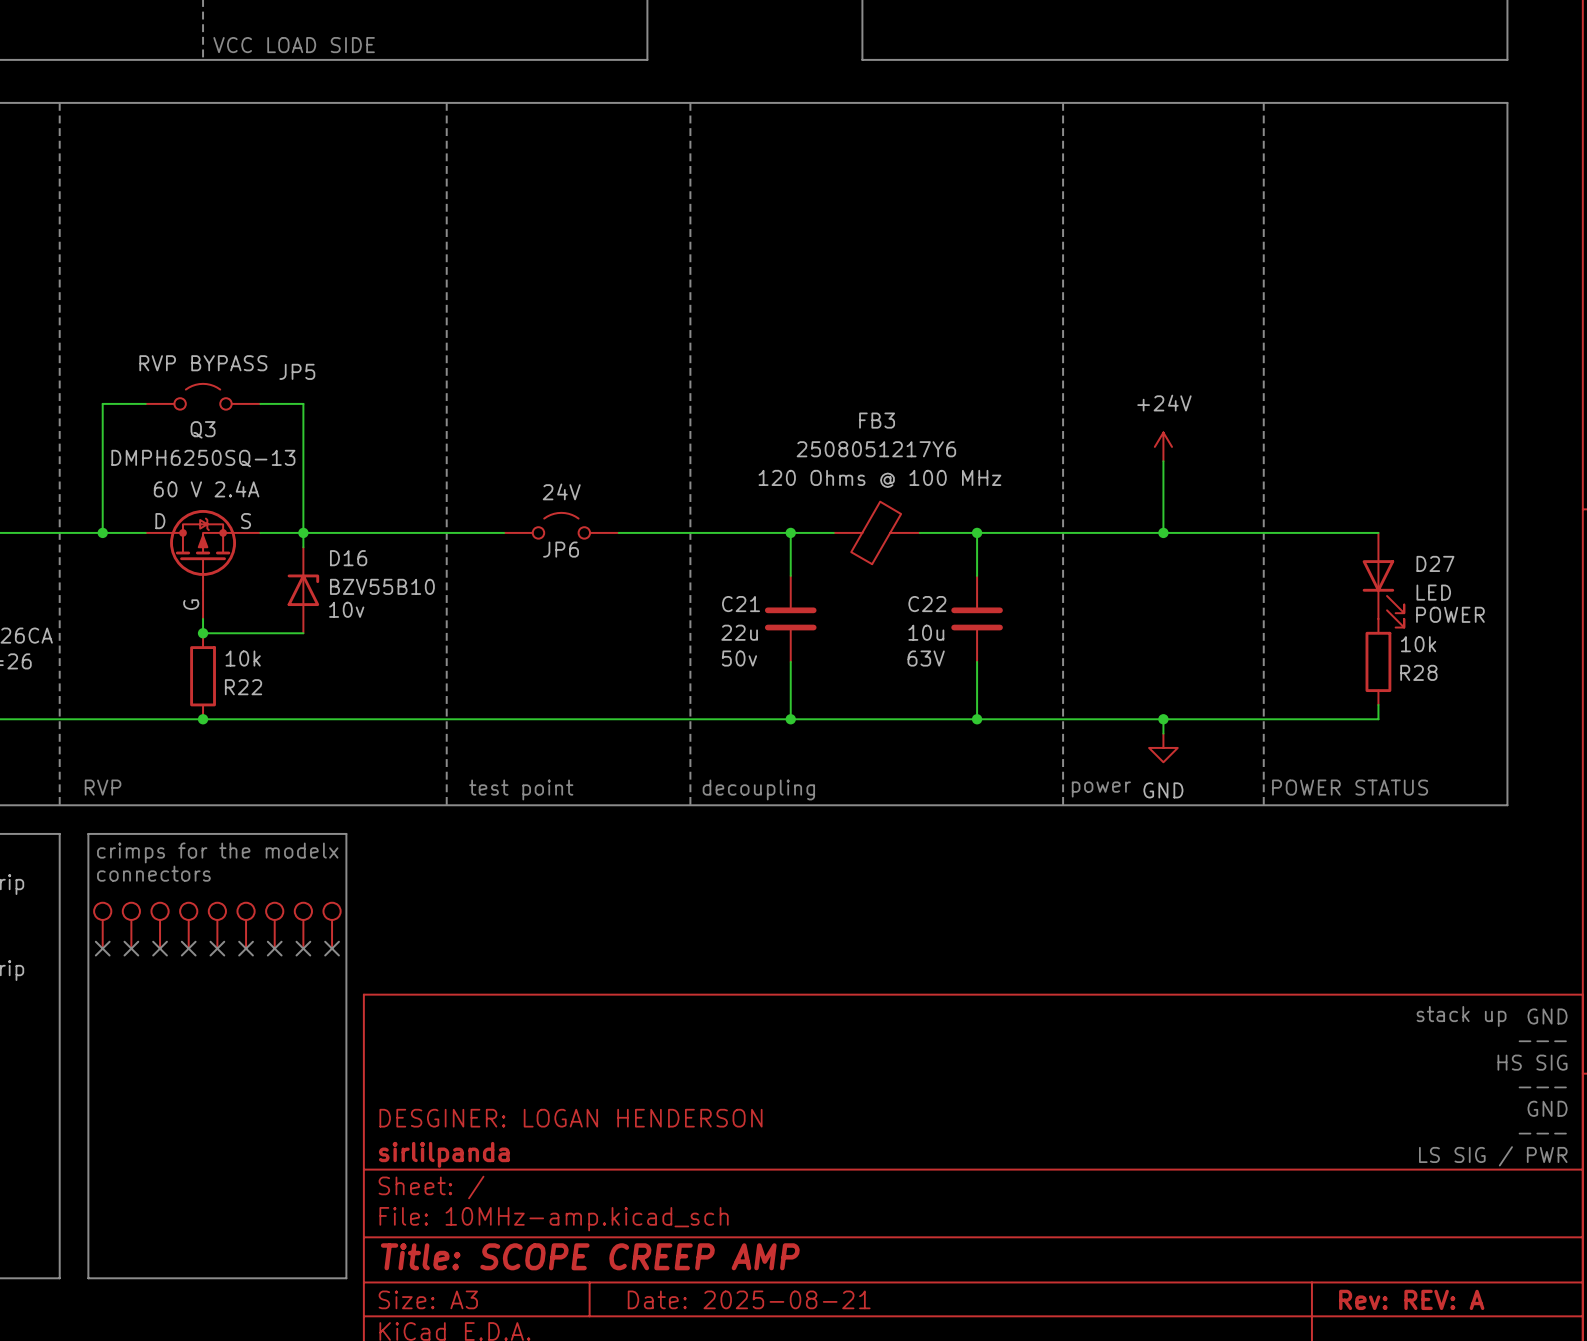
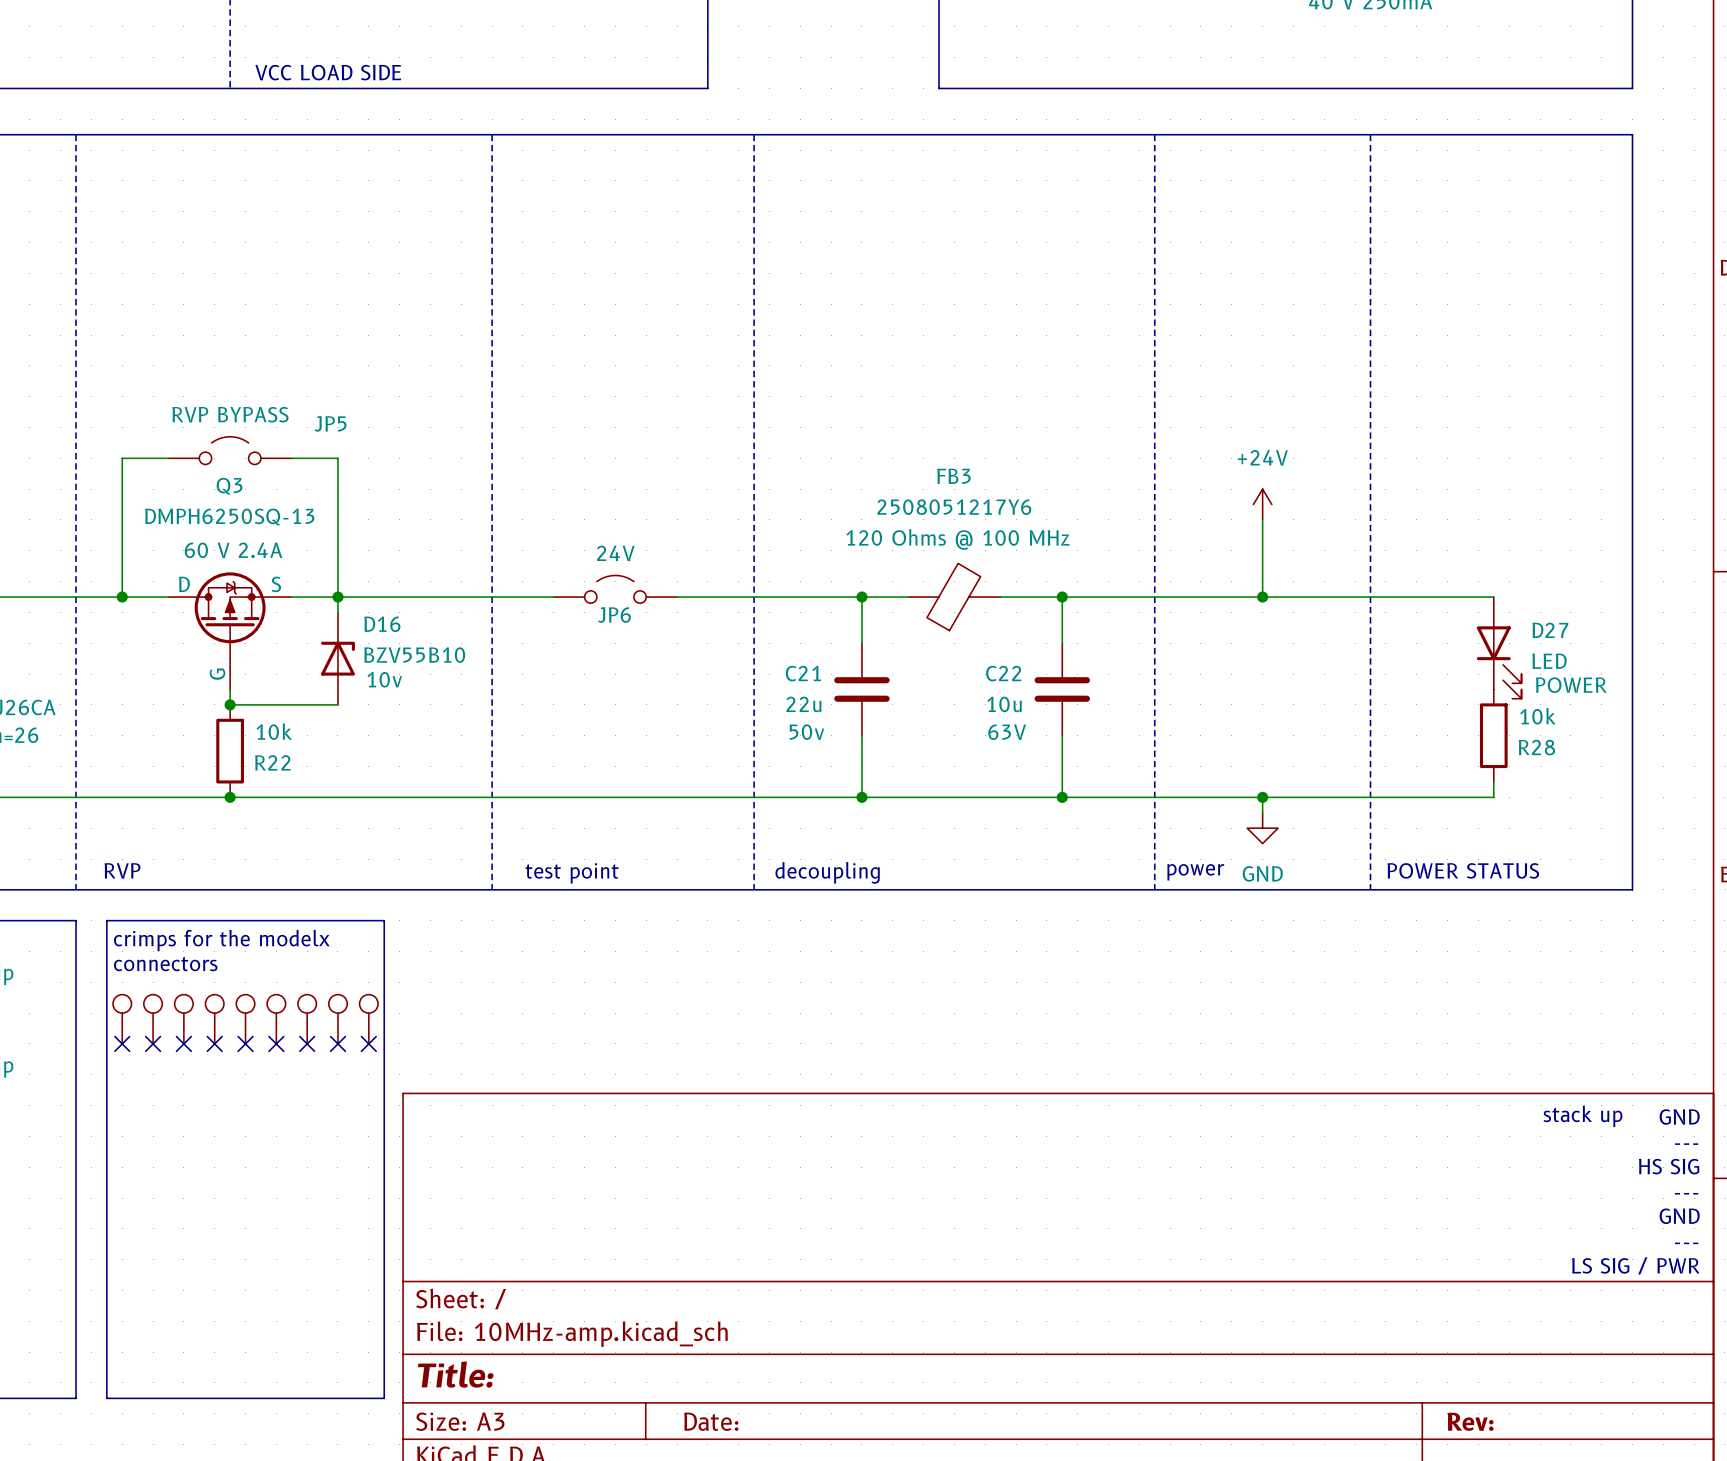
title block: DESGINER: LOGAN HENDERSON (570, 1118) -> none
title block: sirlilpanda (444, 1154) -> none
title block: Title: SCOPE CREEP AMP (590, 1256) -> Title: (455, 1374)
title block: Date: 2025-08-21 (749, 1299) -> Date: (711, 1421)
title block: Rev: REV: A (1411, 1299) -> Rev: (1470, 1421)

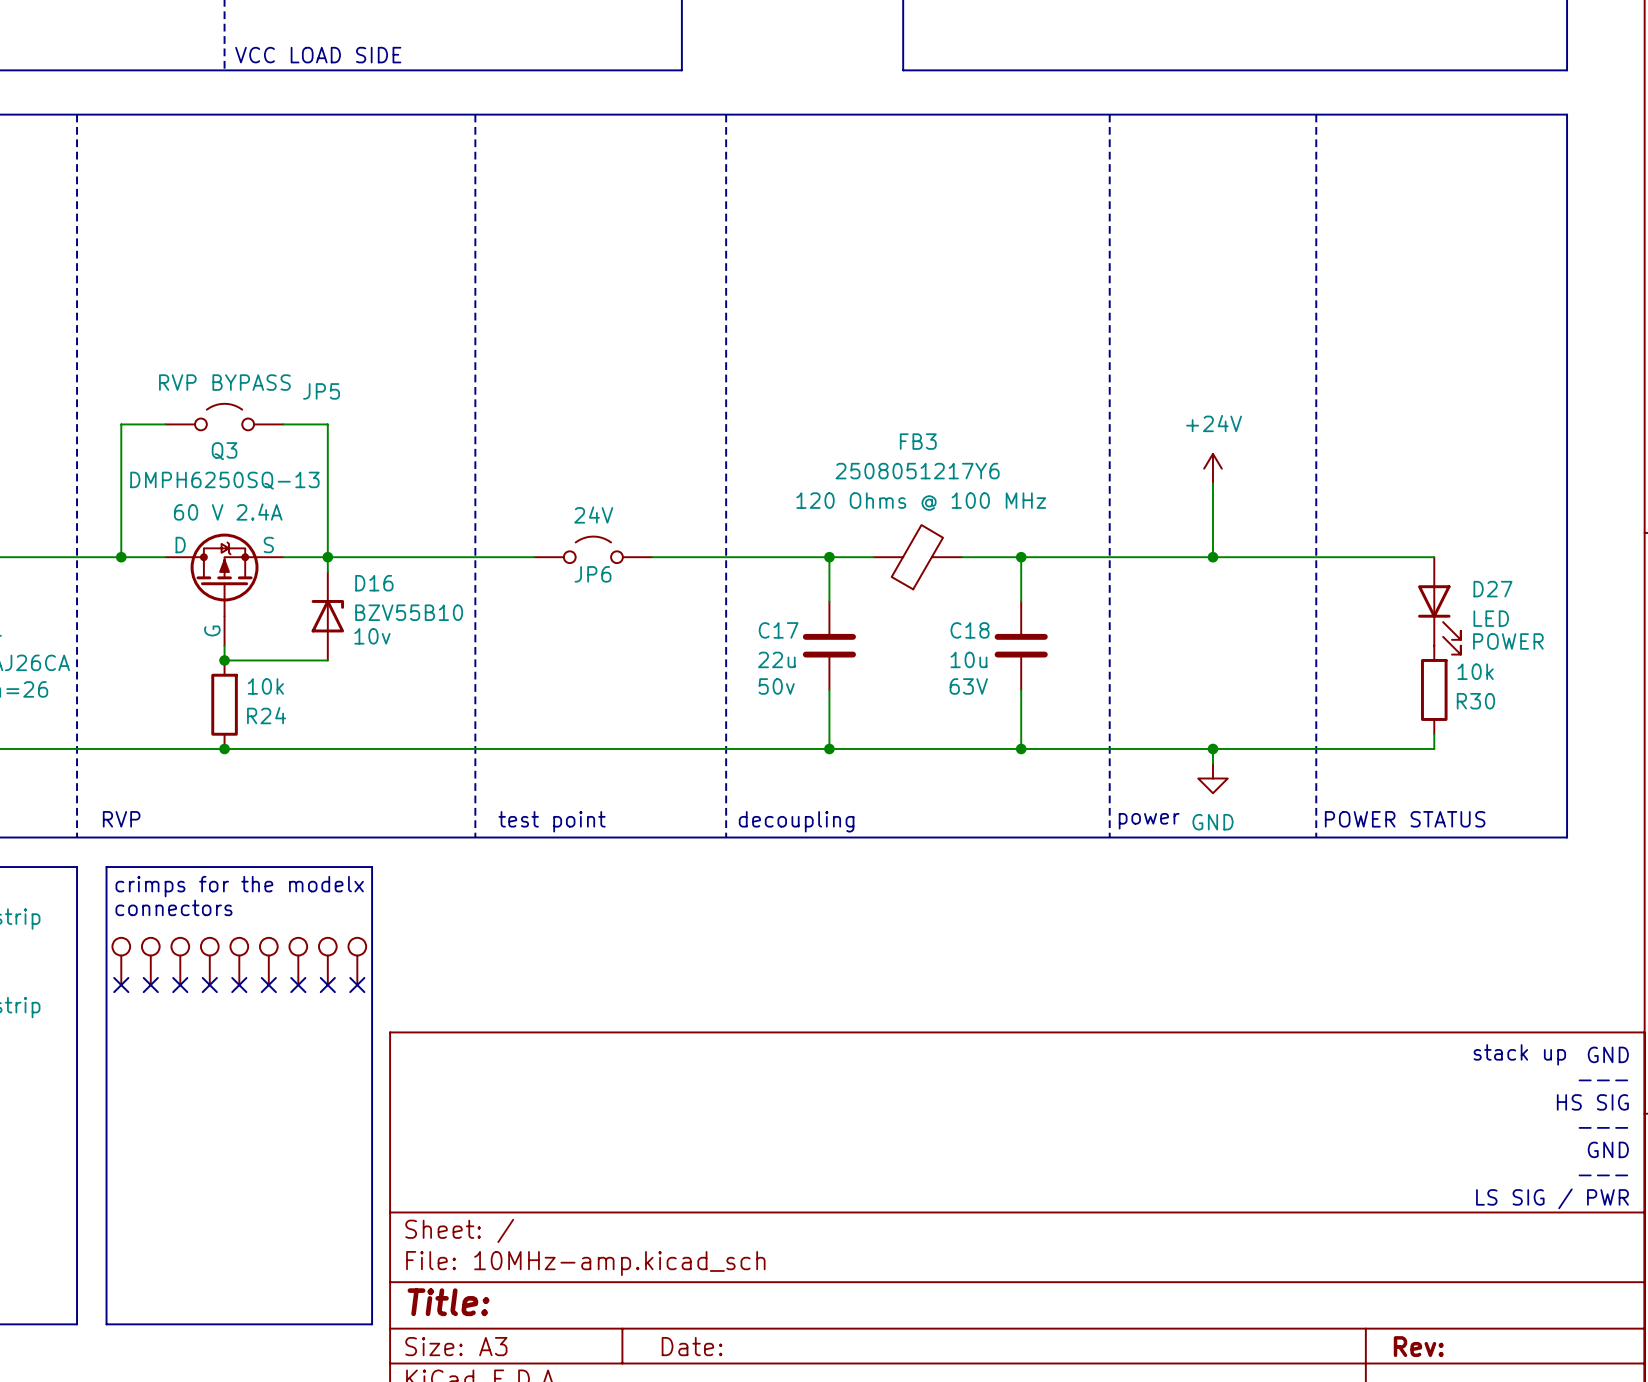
C21 name: C21 (803, 673) -> C17 (778, 630)
C22 name: C22 (1003, 673) -> C18 (970, 630)
R28 name: R28 (1536, 747) -> R30 (1475, 701)
R22 name: R22 (272, 762) -> R24 (266, 715)

